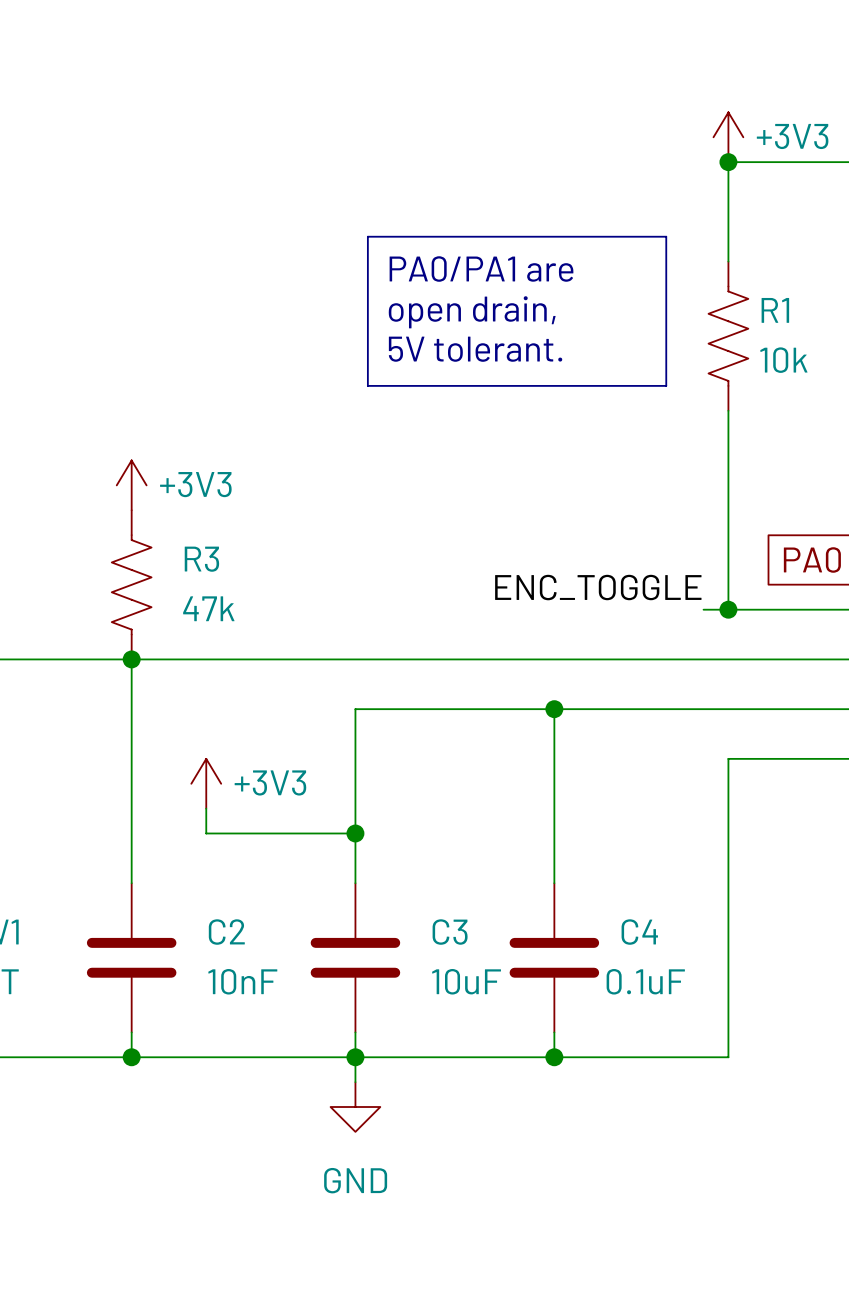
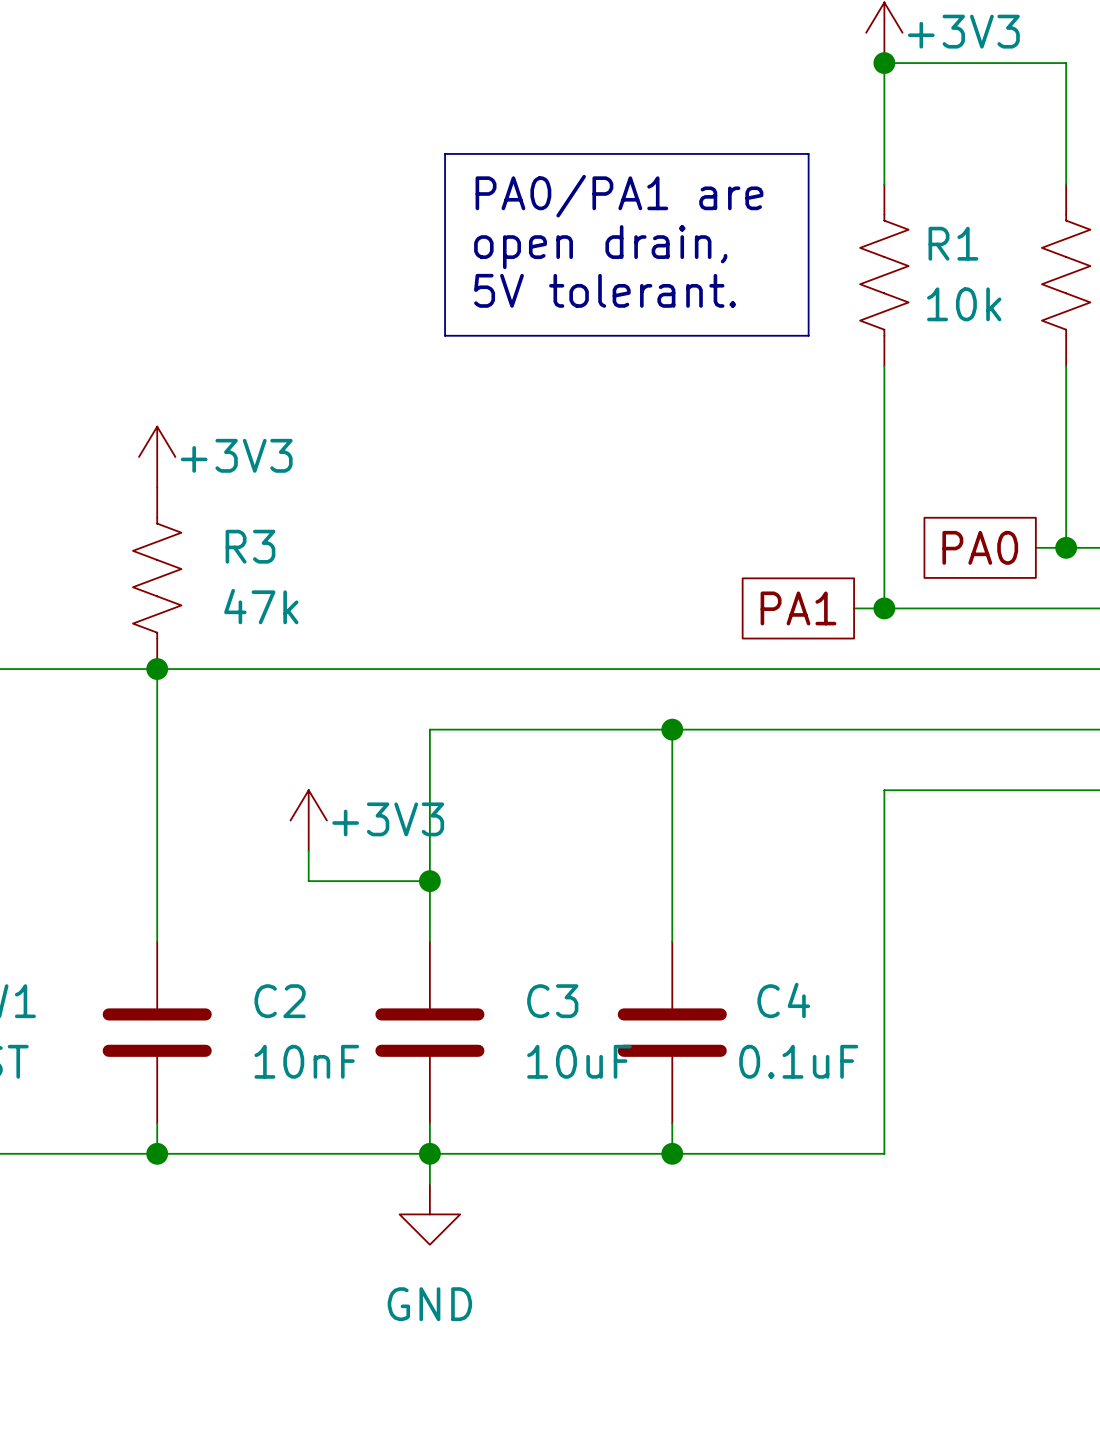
label: ENC_TOGGLE (598, 587) -> none
global label: none -> PA1 (798, 608)
power symbol position: +3V3 (206, 783) -> +3V3 (308, 820)
wire: (206, 808) (206, 833) (255, 833) -> (308, 850) (308, 881)

